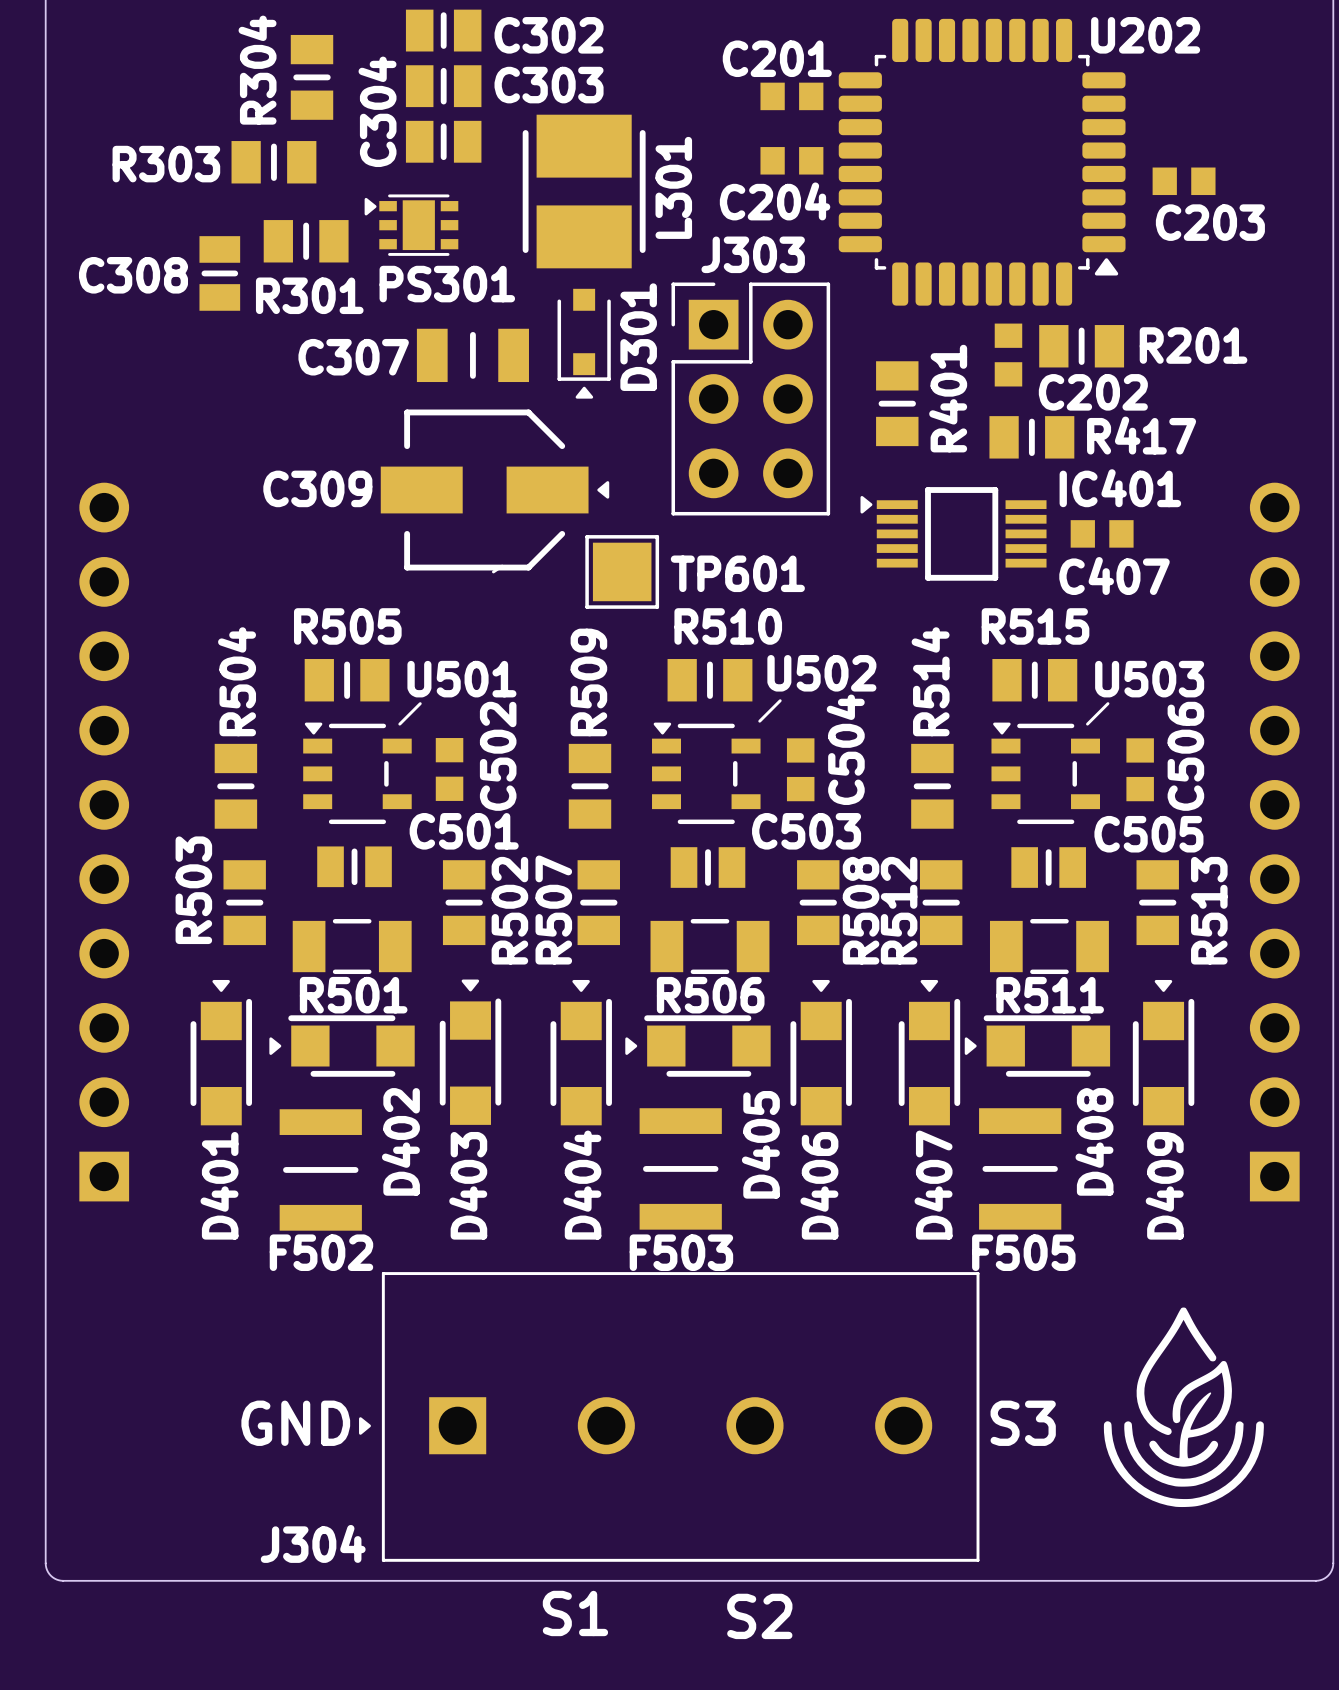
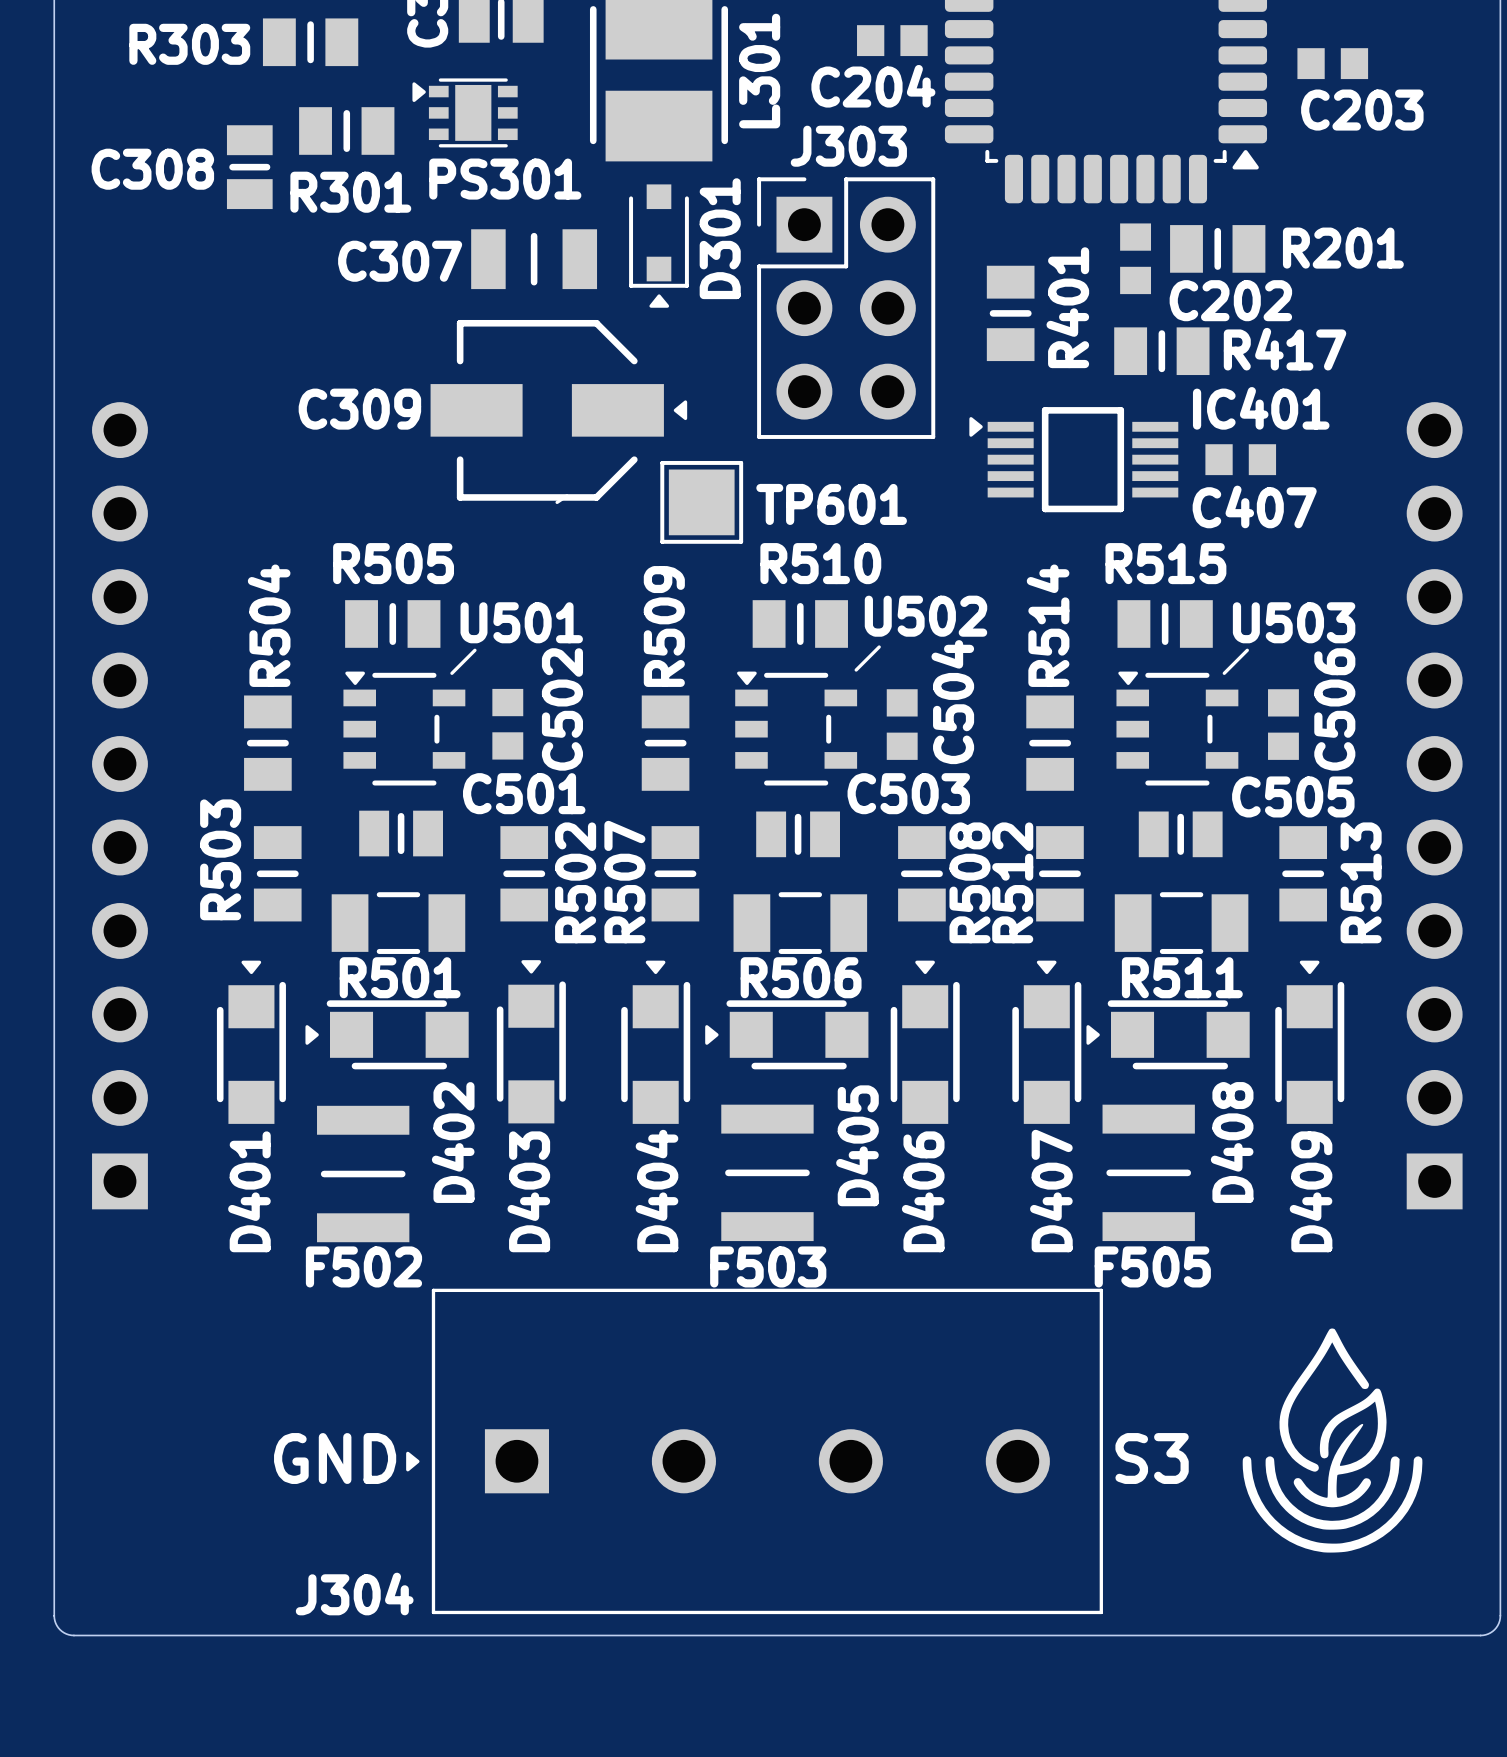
text: S1 (575, 1613) -> none
text: S2 (759, 1616) -> none

